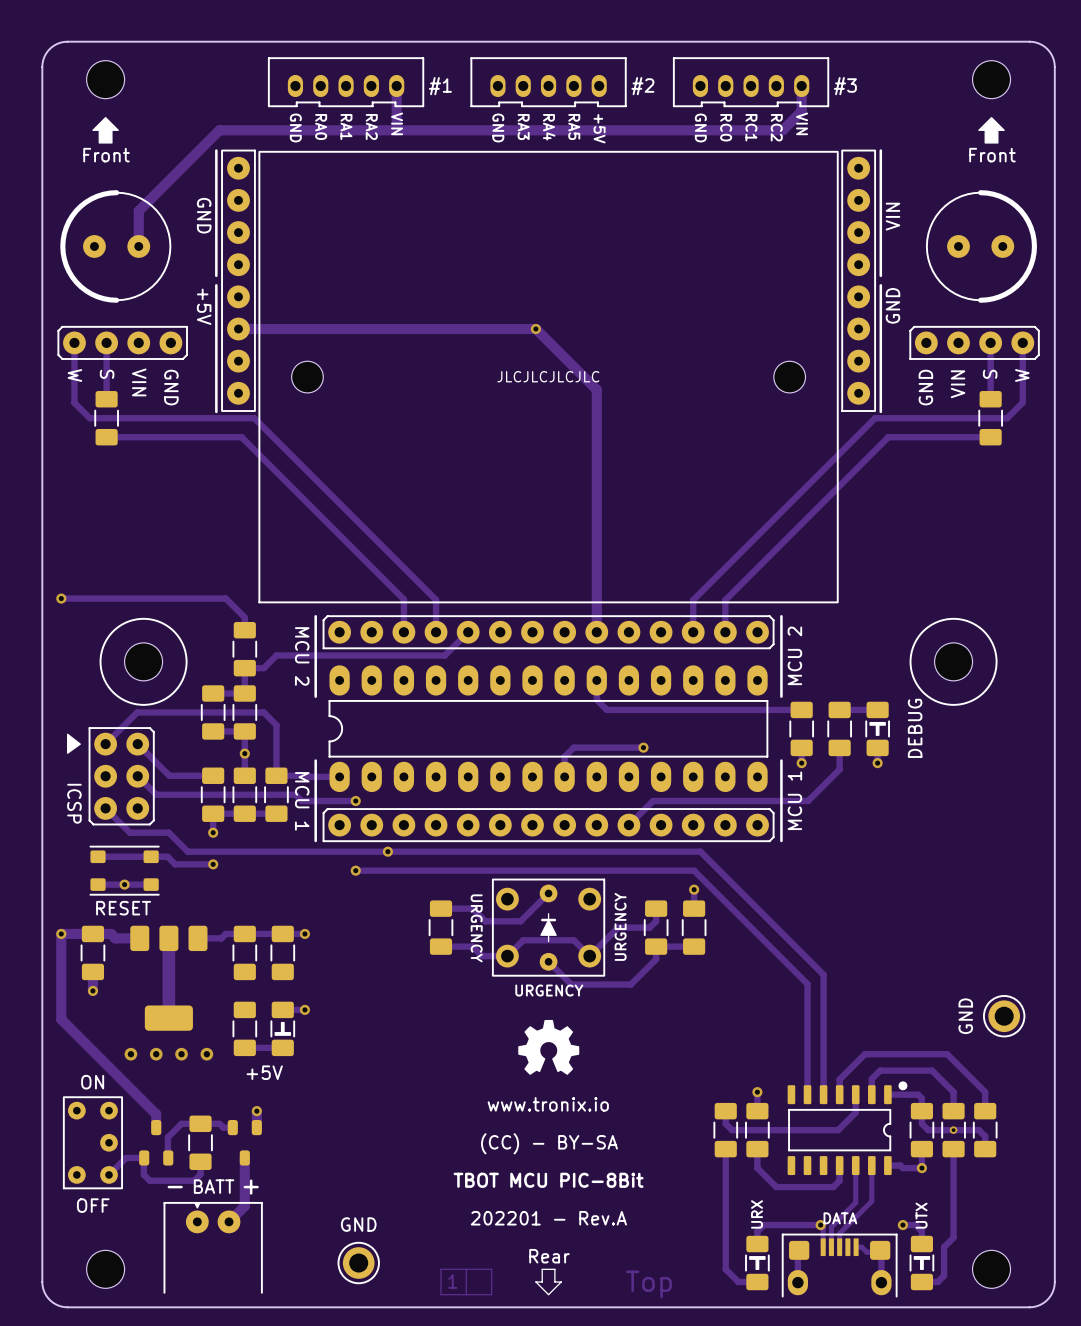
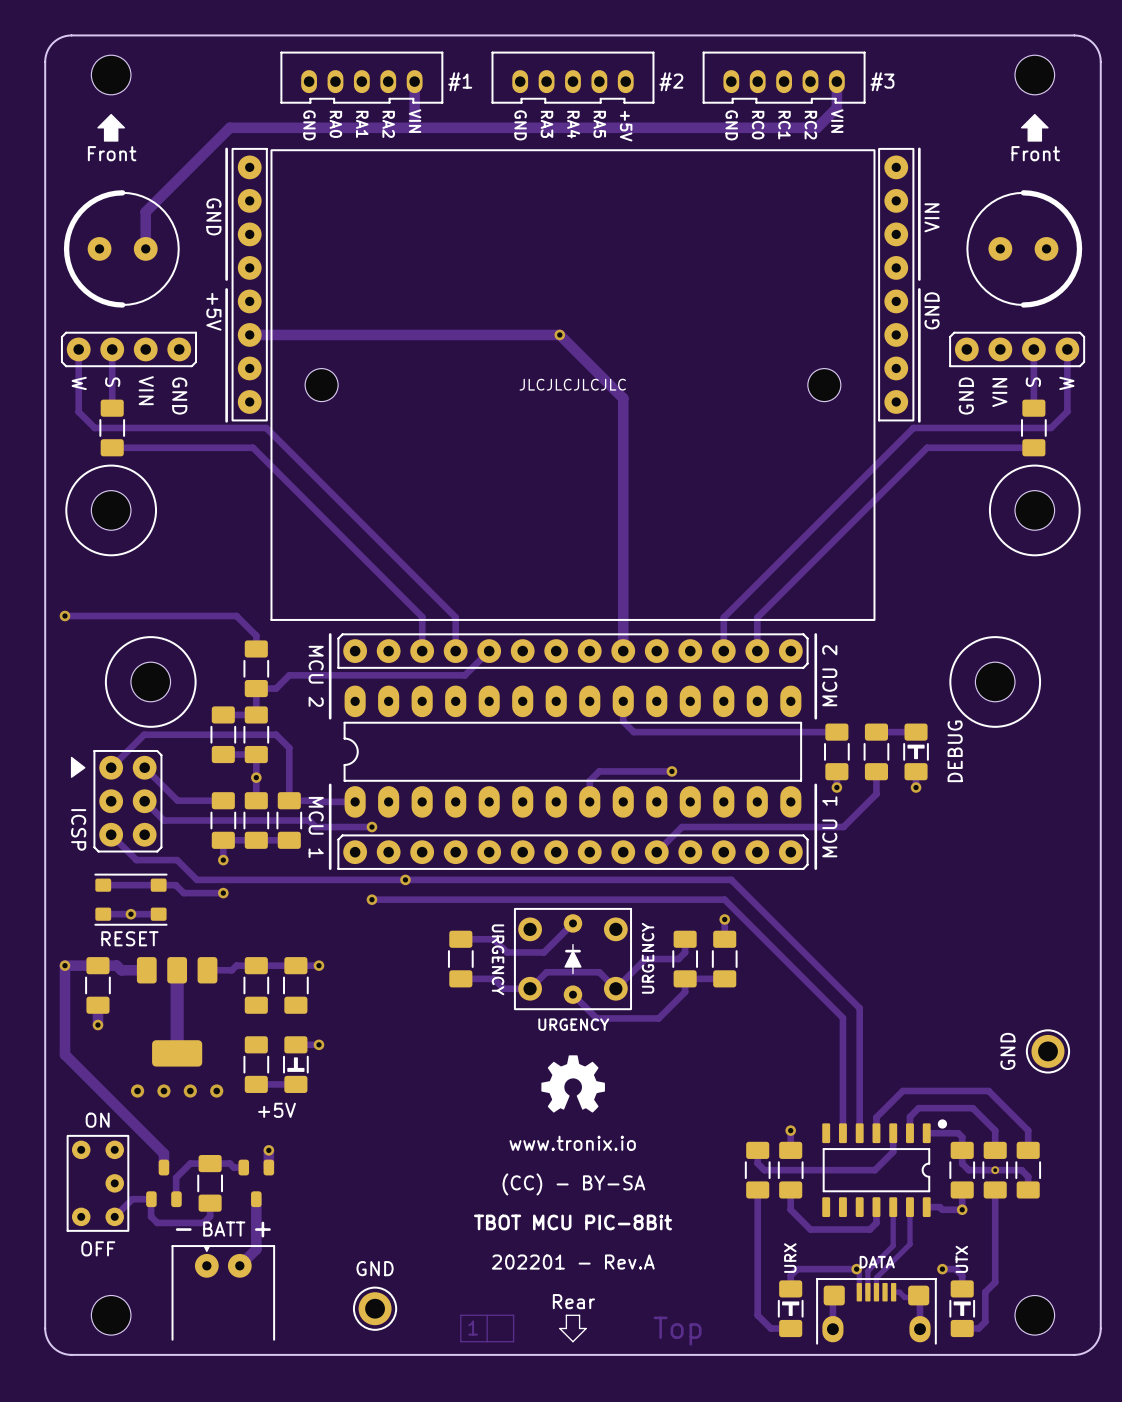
part: none -> (111, 510)
part: none -> (1034, 510)

